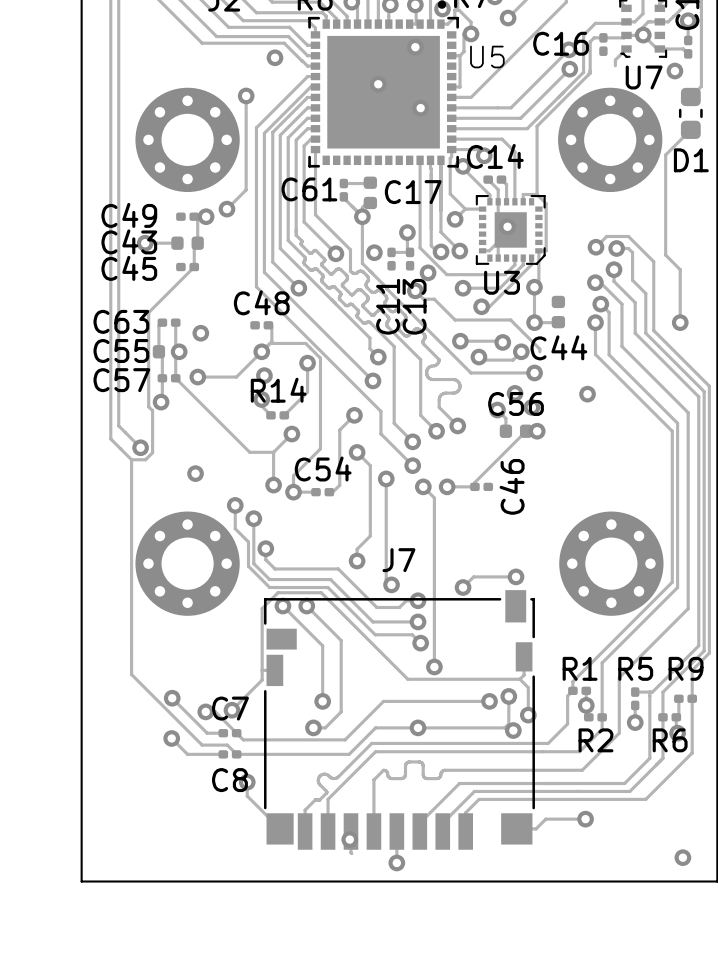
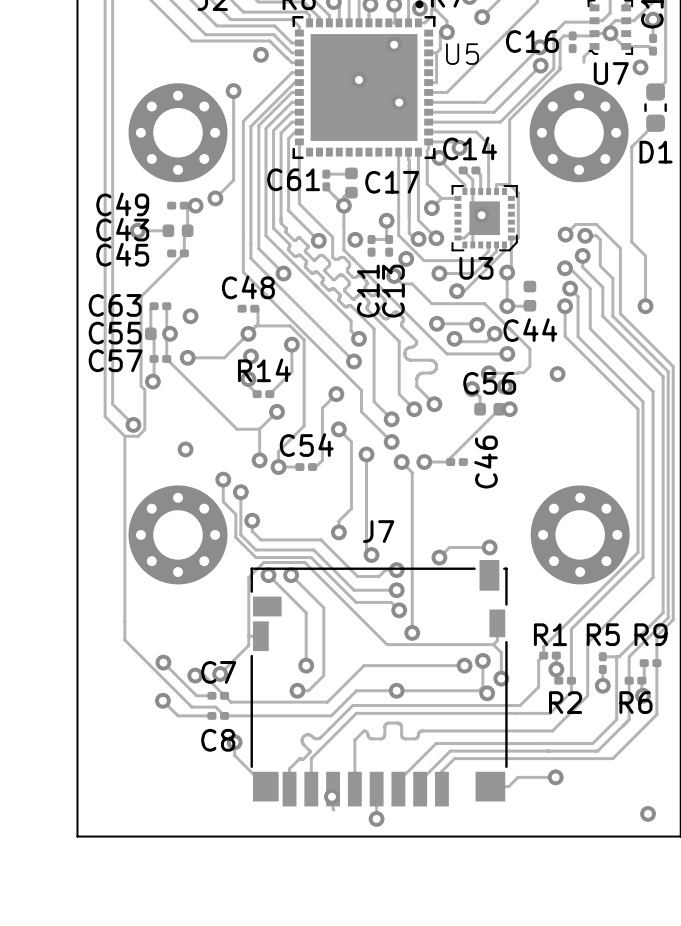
track: (539, 349) (539, 351) -> (512, 331) (529, 348) (529, 366) (523, 372) (488, 373)

